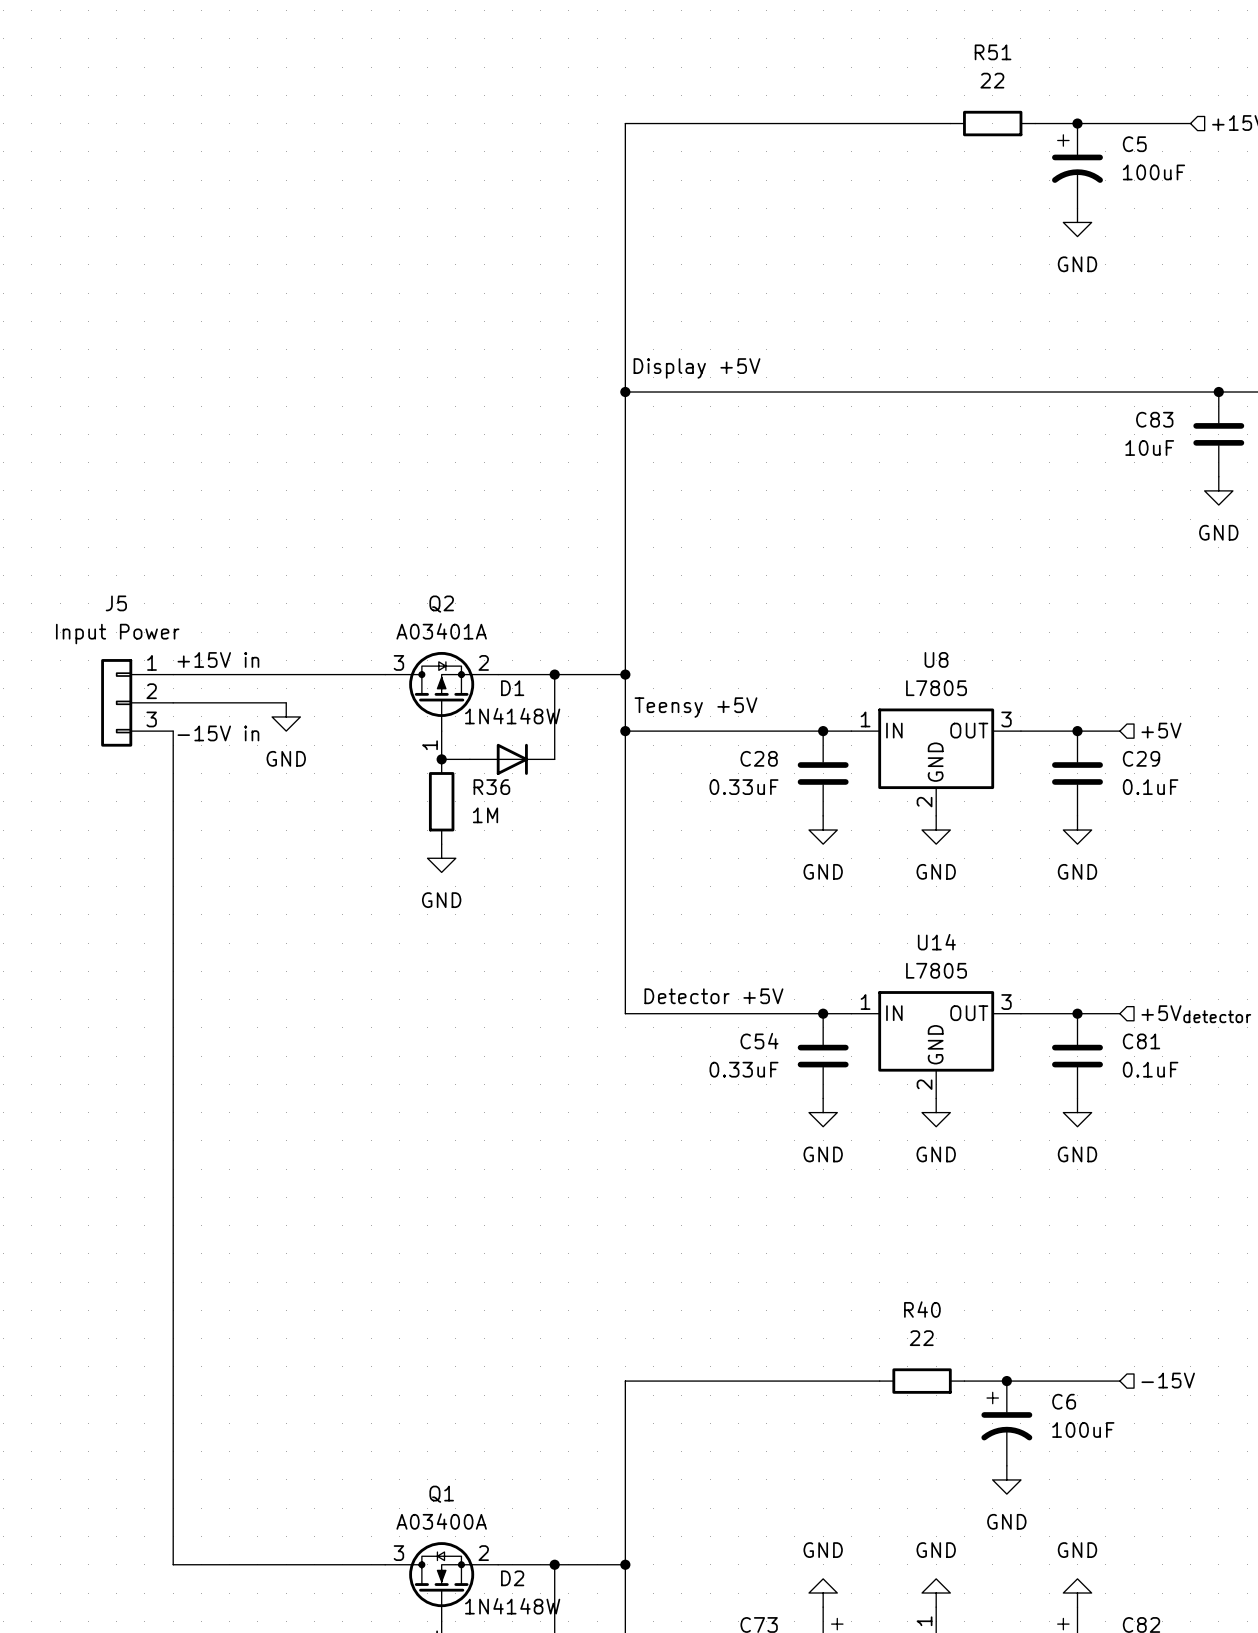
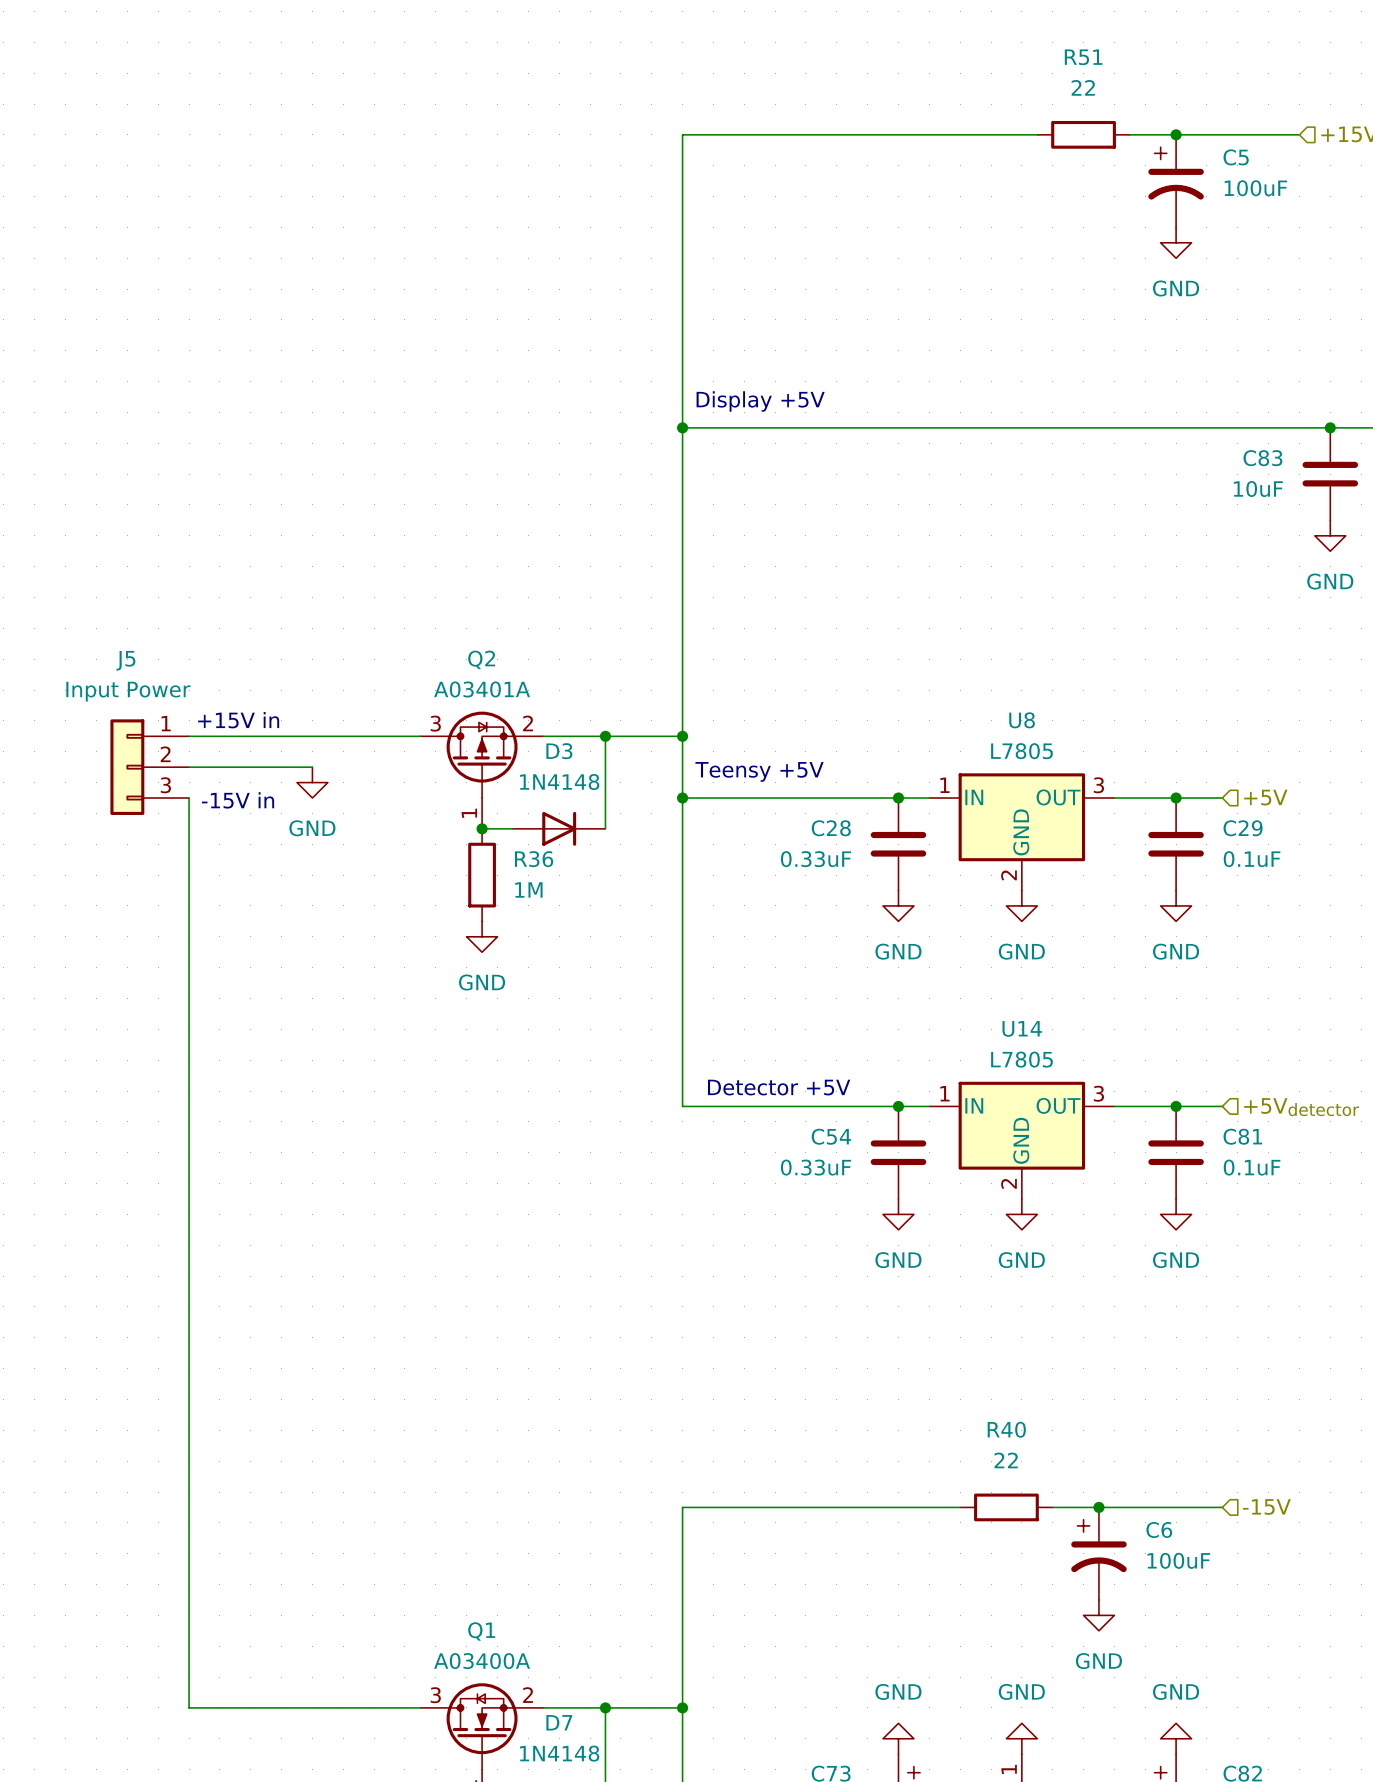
D1 name: D1 (512, 688) -> D3 (559, 751)
D1 value: 1N4148W (512, 716) -> 1N4148 (559, 782)
D2 name: D2 (512, 1578) -> D7 (559, 1722)
D2 value: 1N4148W (512, 1606) -> 1N4148 (559, 1753)

